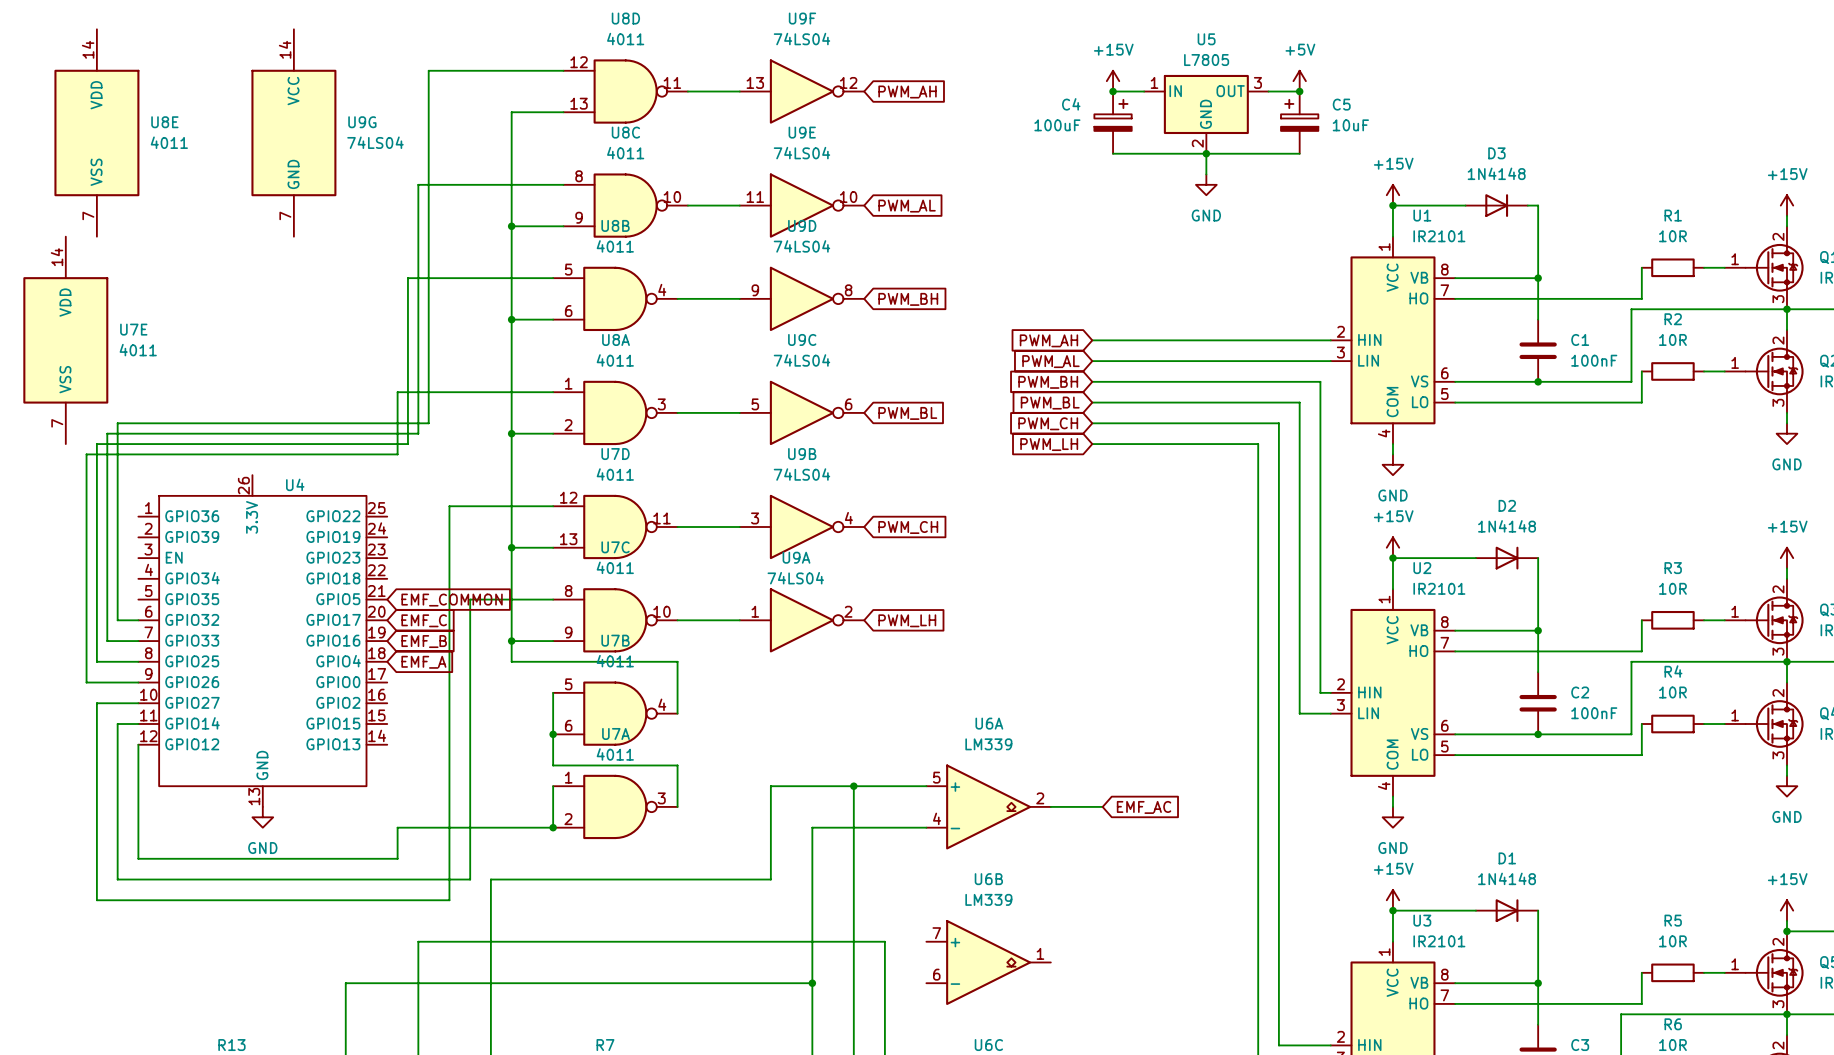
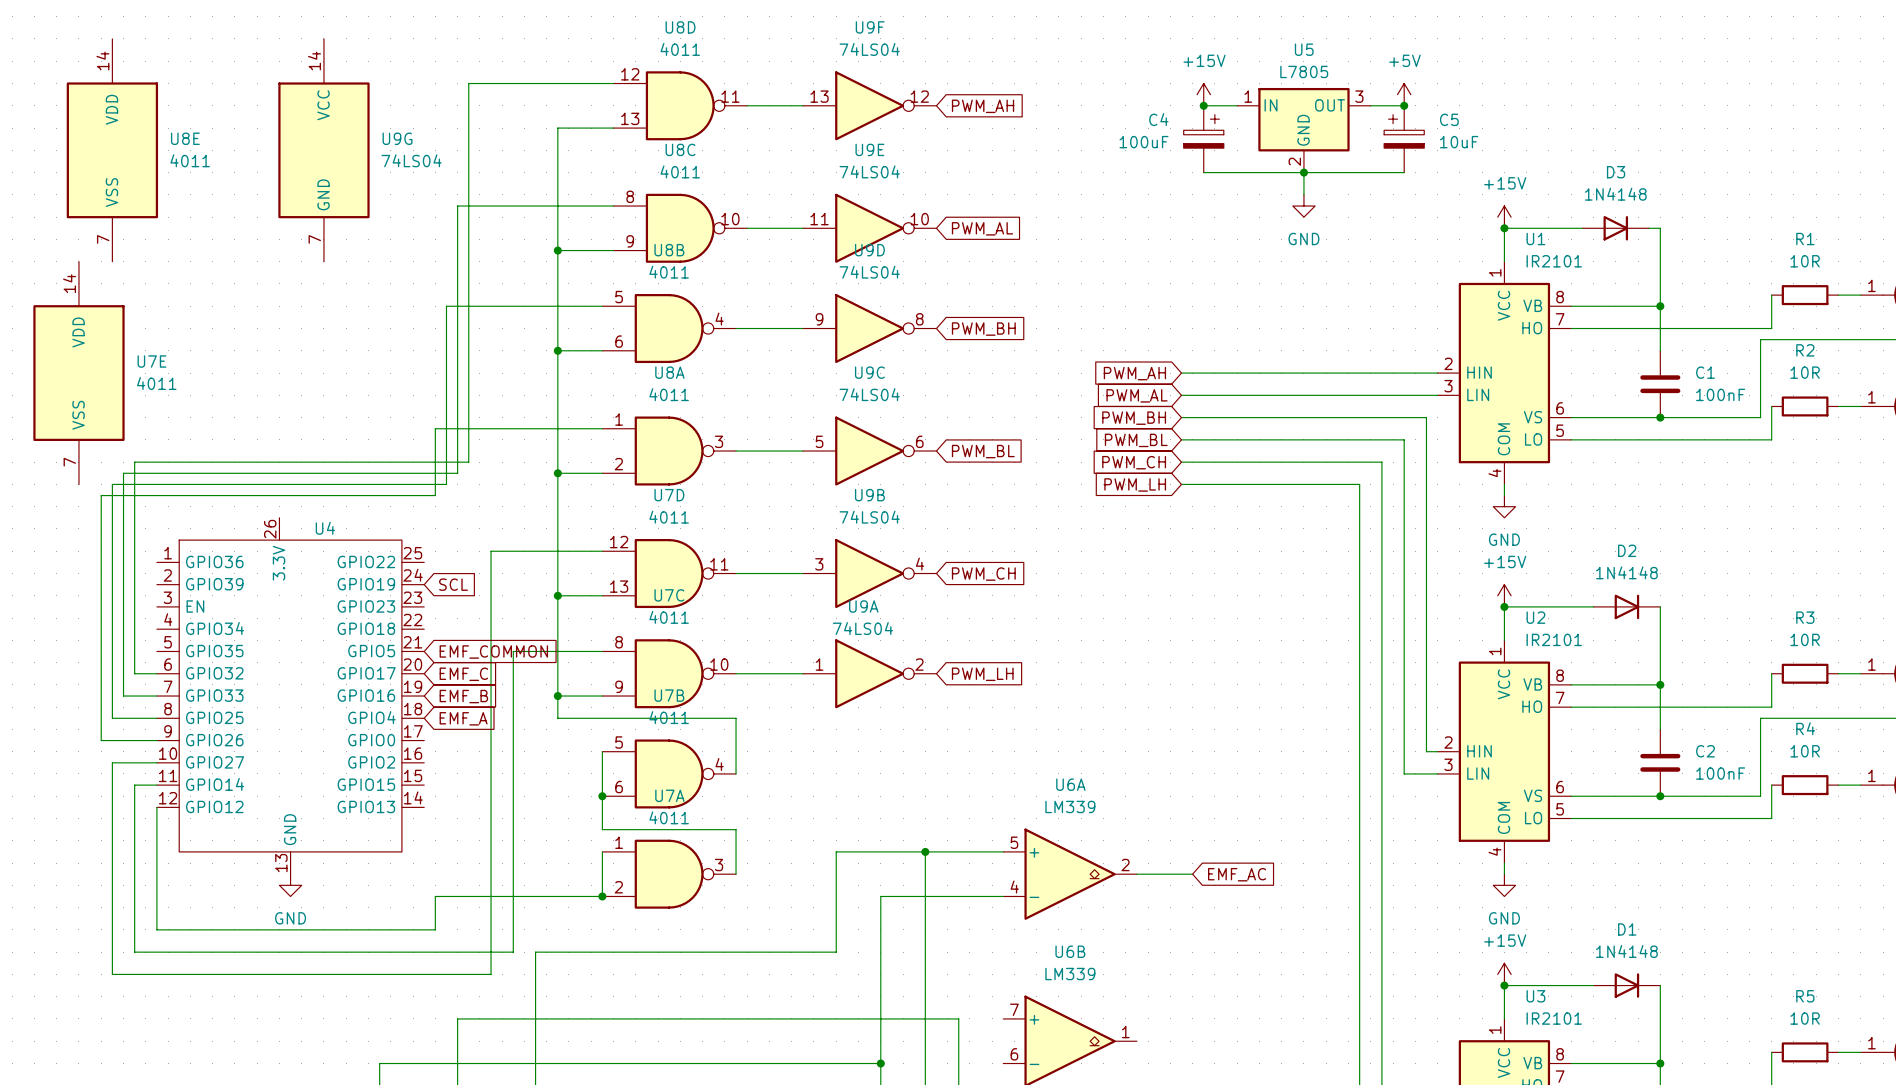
global label: none -> SCL (453, 584)

